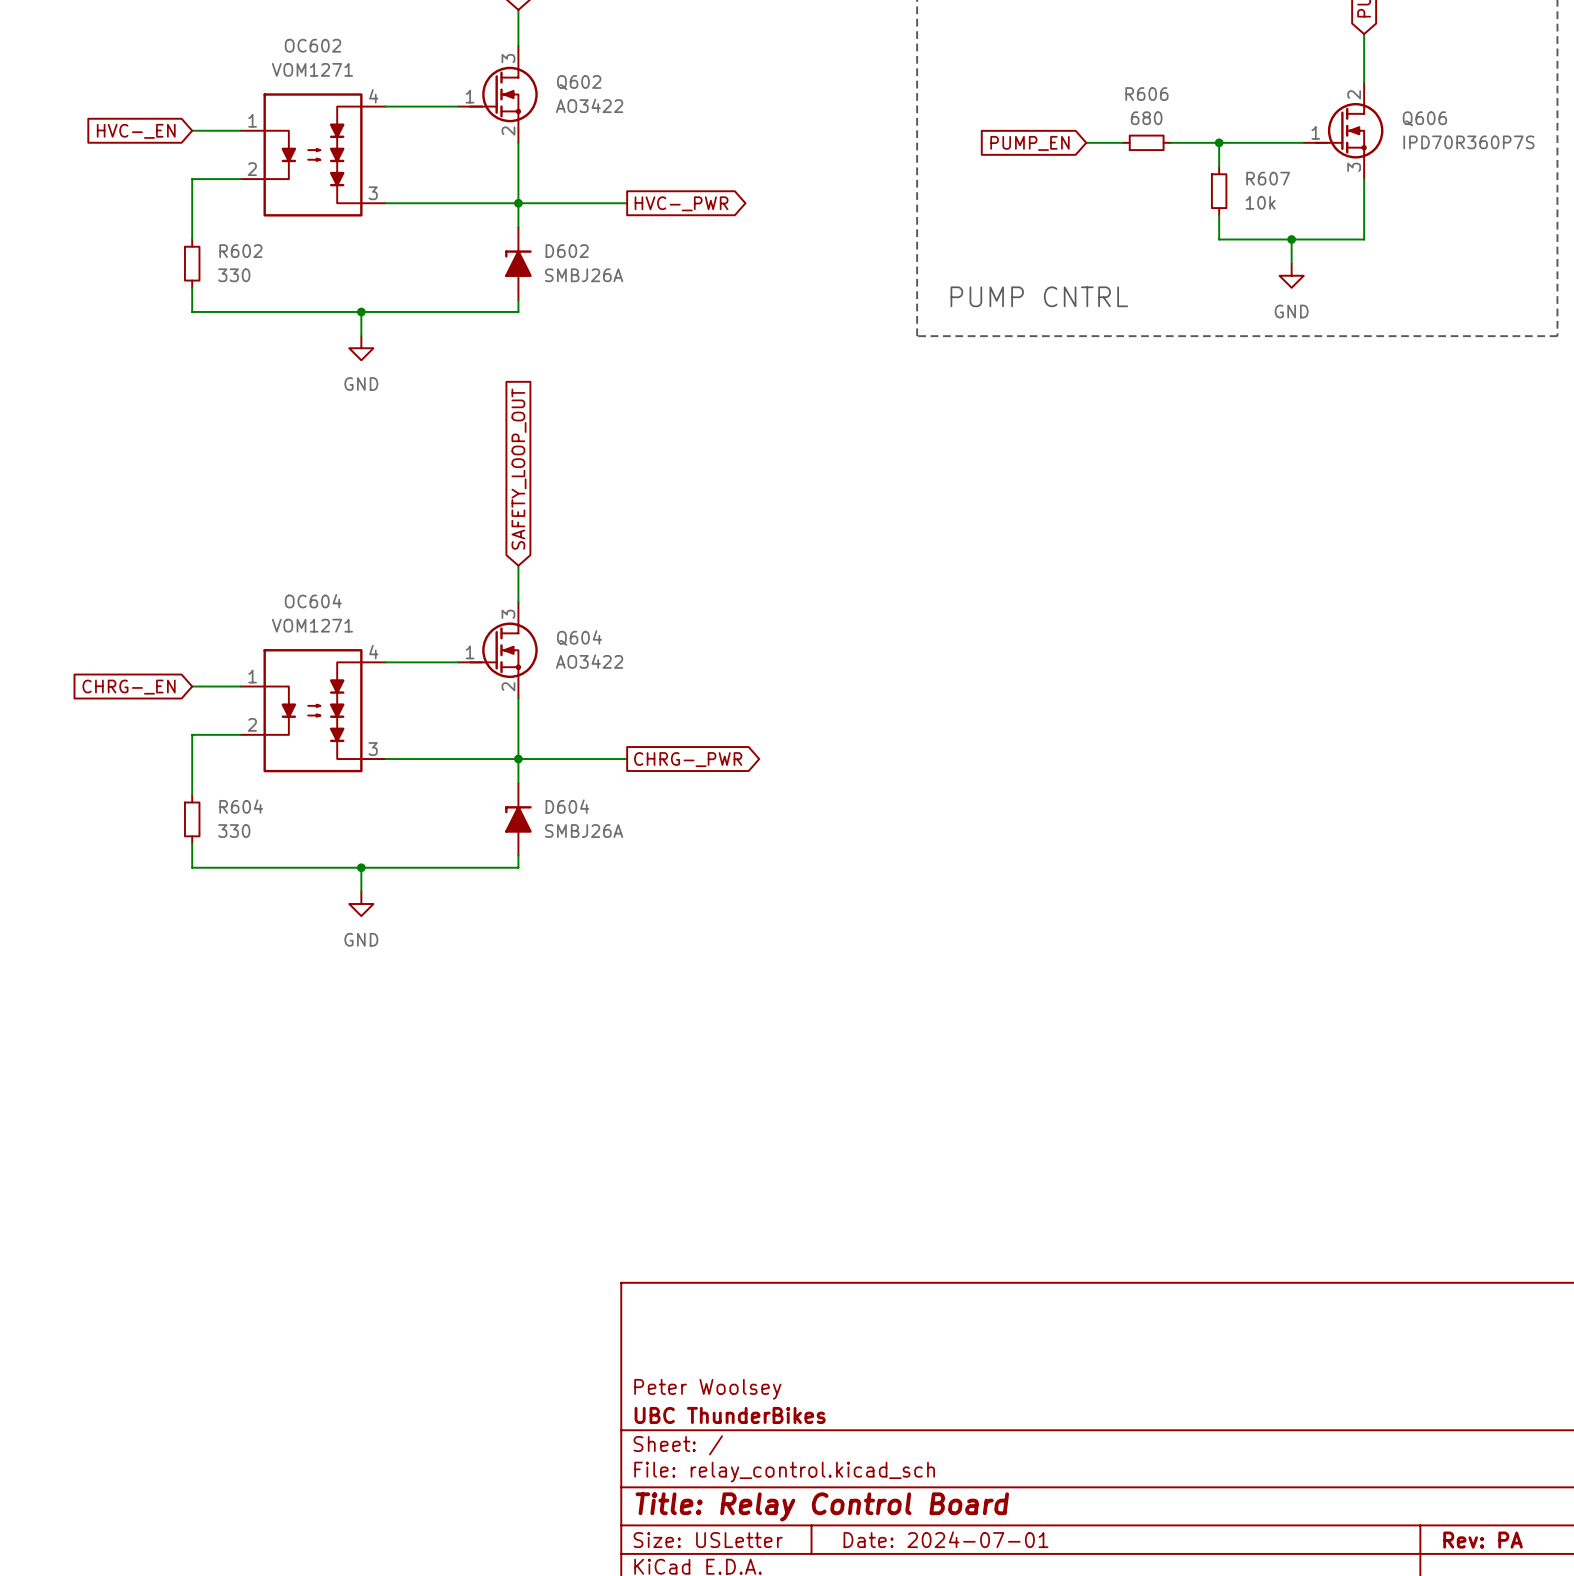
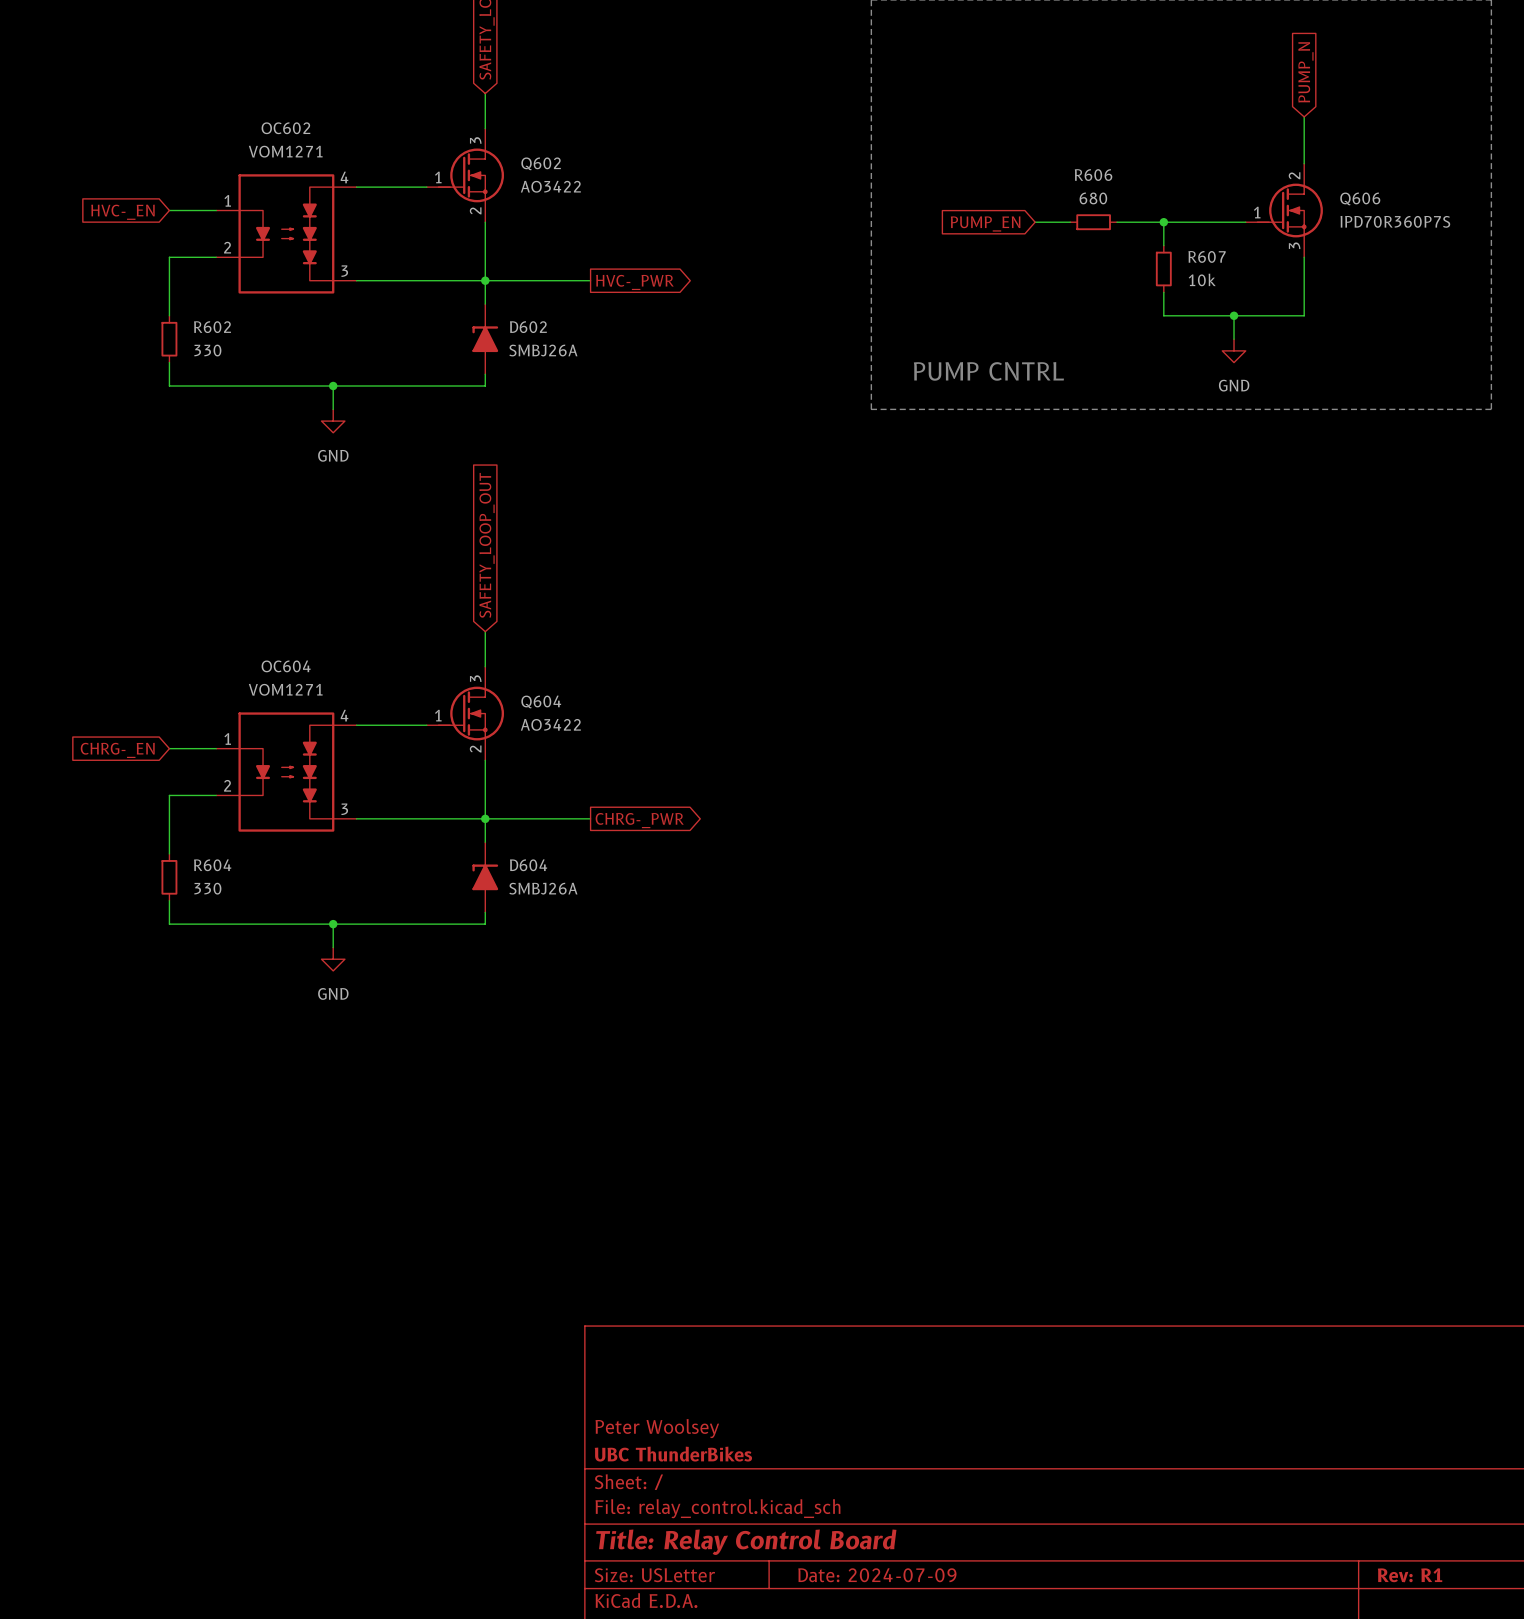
title block: Date: 2024-07-01 (945, 1539) -> Date: 2024-07-09 (877, 1575)
title block: Rev: PA (1483, 1540) -> Rev: R1 (1410, 1575)

